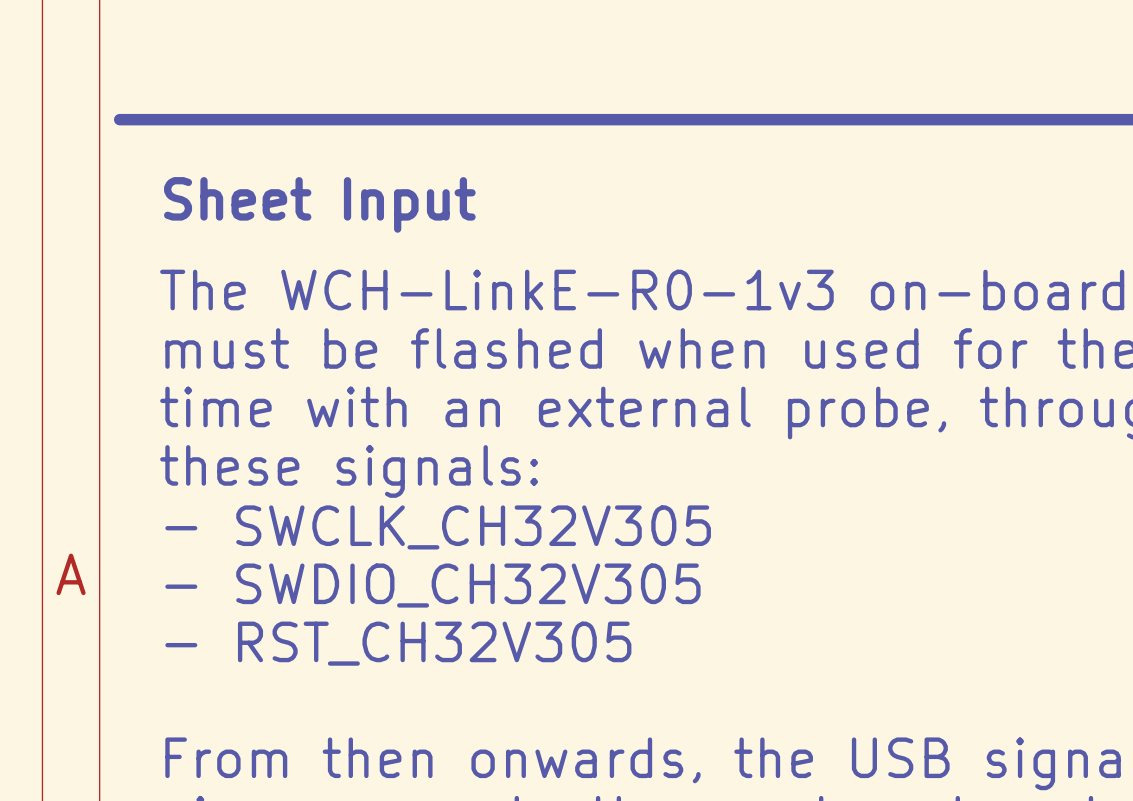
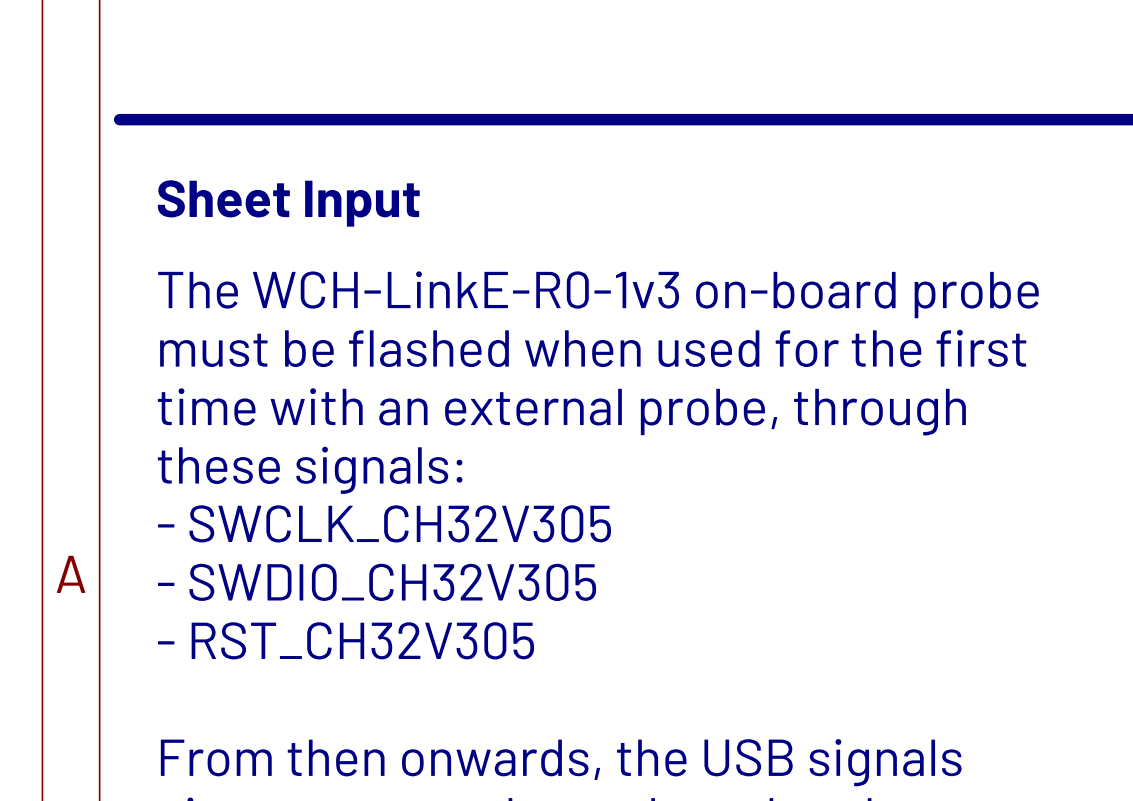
text: SWCLK_CH32V305 (473, 527) -> none
text: - (181, 528) -> - SWCLK_CH32V305 (384, 523)
text: SWDIO_CH32V305 (468, 585) -> none
text: - (181, 586) -> - SWDIO_CH32V305 (377, 582)
text: RST_CH32V305 (434, 643) -> none
text: - (181, 645) -> - RST_CH32V305 (346, 640)

